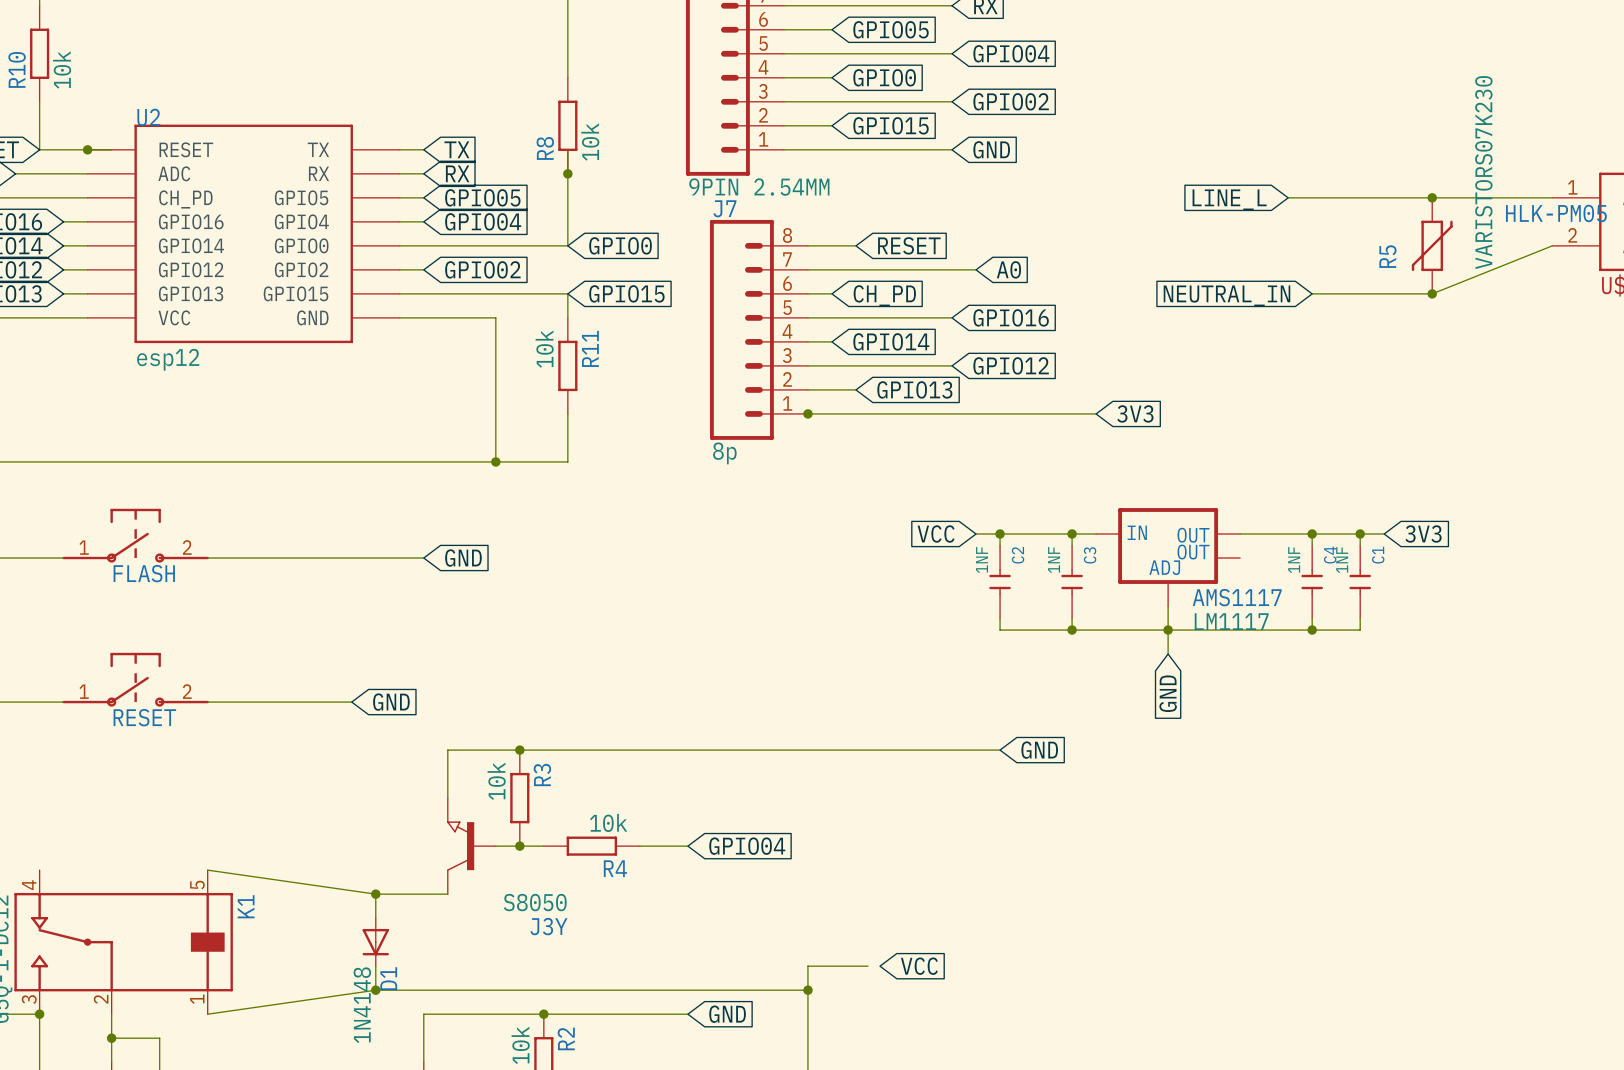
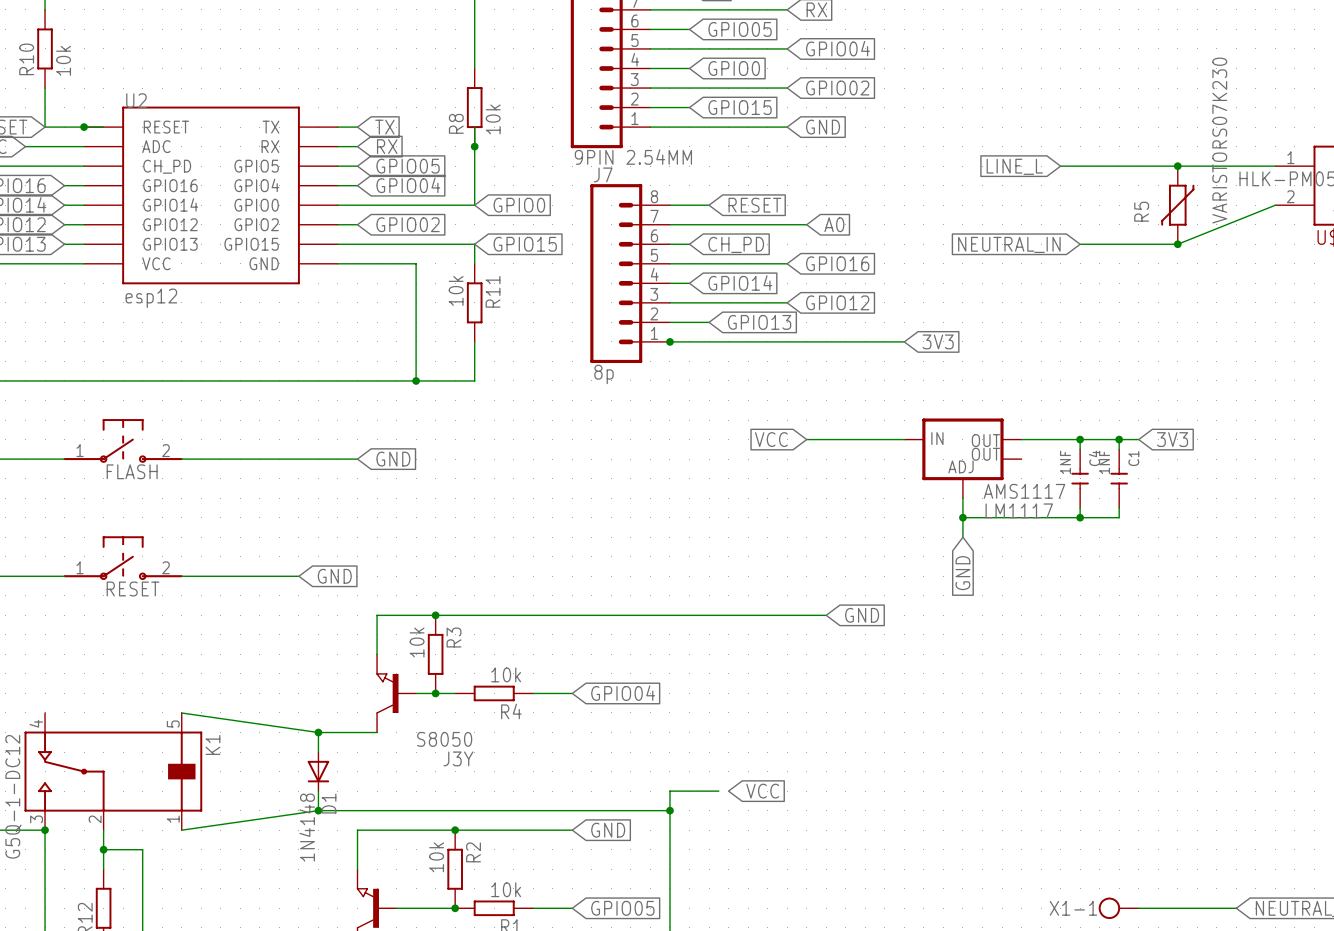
wire: (1000, 533) (1000, 546) -> none
junction: (1000, 533) -> none
wire: (1072, 533) (1072, 546) -> none
junction: (1072, 533) -> none
C2: 1NF (1000, 582) -> none
C3: 1NF (1072, 582) -> none
wire: (1000, 618) (1000, 630) (1168, 630) -> none
wire: (1072, 618) (1072, 630) -> none
junction: (1072, 630) -> none

